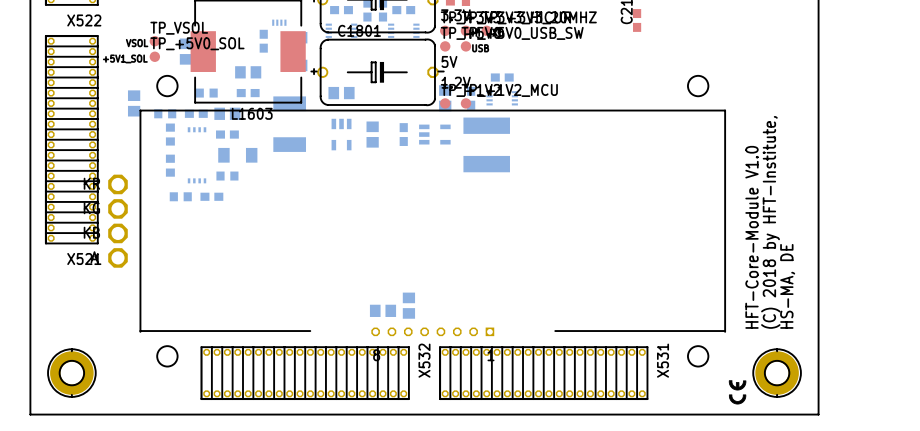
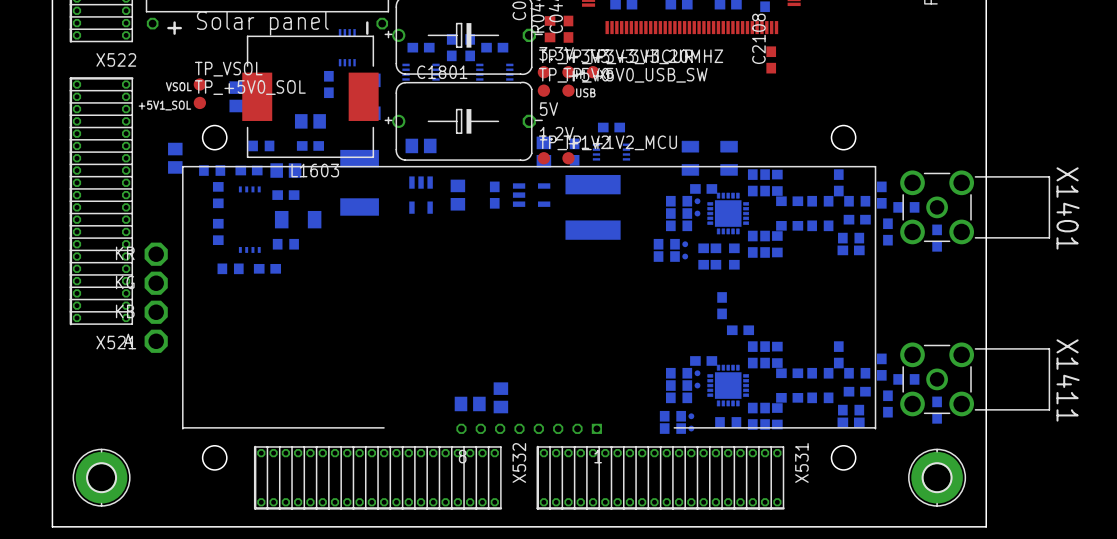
part: none -> (709, 158)
part: none -> (752, 182)
part: none -> (765, 182)
part: none -> (777, 182)
part: none -> (838, 182)
part: none -> (703, 188)
part: none -> (881, 195)
part: none -> (679, 201)
part: none -> (697, 201)
part: none -> (789, 201)
part: none -> (820, 201)
part: none -> (857, 201)
part: none -> (906, 207)
X1401: none -> (975, 207)
part: none -> (679, 213)
part: none -> (697, 213)
part: none -> (728, 213)
part: none -> (857, 219)
part: none -> (679, 225)
part: none -> (789, 225)
part: none -> (820, 225)
part: none -> (887, 231)
part: none -> (851, 238)
part: none -> (937, 238)
part: none -> (666, 244)
part: none -> (685, 244)
part: none -> (752, 244)
part: none -> (765, 244)
part: none -> (777, 244)
part: none -> (851, 250)
part: none -> (666, 256)
part: none -> (685, 256)
part: none -> (703, 256)
part: none -> (715, 256)
part: none -> (734, 256)
text: (C) 2018 by HFT-Institute, (770, 222) -> none
part: none -> (722, 305)
text: HFT-Core-Module V1.0 (751, 237) -> none
part: none -> (740, 330)
part: none -> (752, 354)
part: none -> (765, 354)
part: none -> (777, 354)
part: none -> (838, 354)
part: none -> (703, 360)
part: none -> (881, 367)
part: none -> (679, 373)
part: none -> (697, 373)
part: none -> (789, 373)
part: none -> (820, 373)
part: none -> (857, 373)
text: HS-MA, DE (787, 286) -> none
part: none -> (906, 379)
X1411: none -> (975, 379)
part: none -> (679, 385)
part: none -> (697, 385)
part: none -> (728, 385)
part: none -> (857, 391)
part: none -> (679, 397)
part: none -> (789, 397)
part: none -> (820, 397)
part: none -> (887, 403)
part: none -> (851, 410)
part: none -> (937, 410)
part: none -> (672, 416)
part: none -> (691, 416)
part: none -> (752, 416)
part: none -> (765, 416)
part: none -> (777, 416)
part: none -> (728, 422)
part: none -> (851, 422)
part: none -> (672, 428)
part: none -> (691, 428)
drawing: [728, 380, 747, 405] -> none

